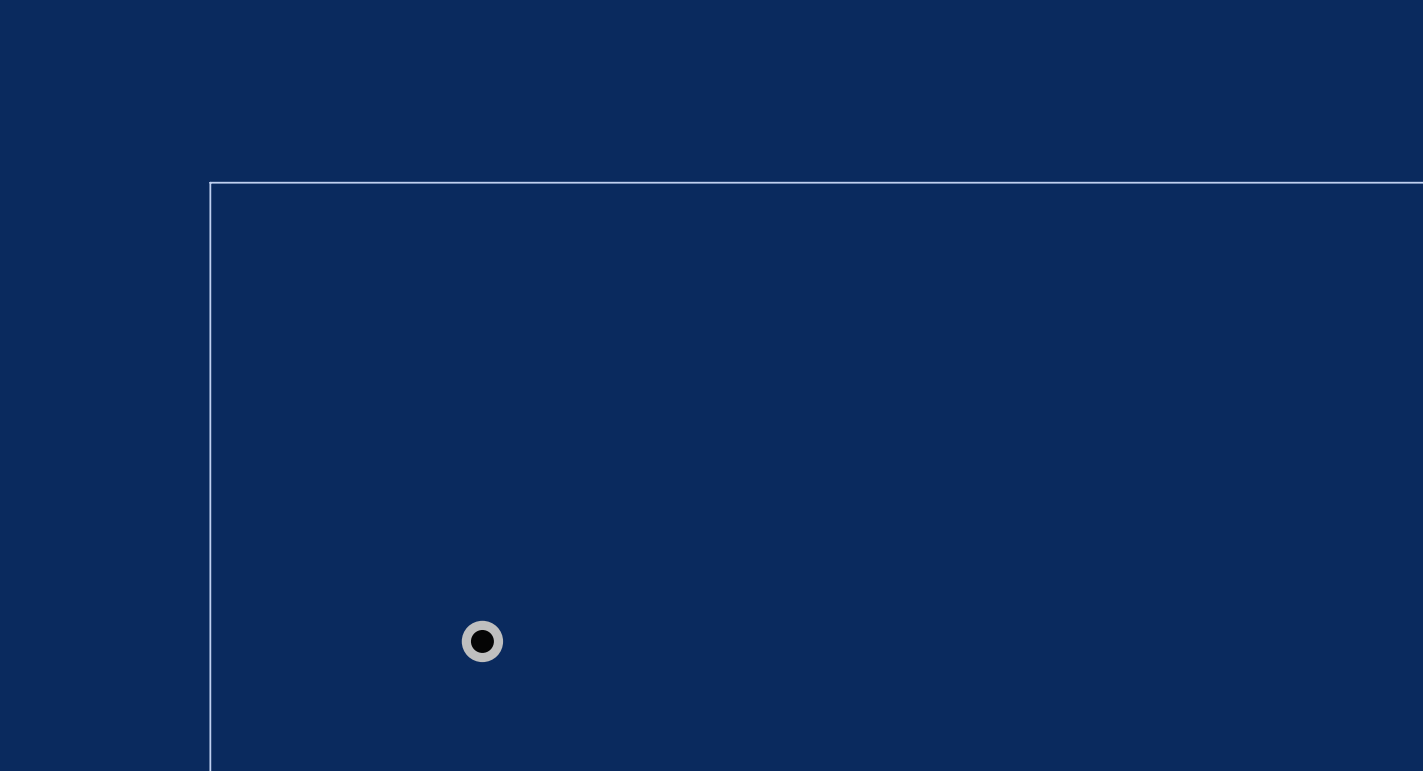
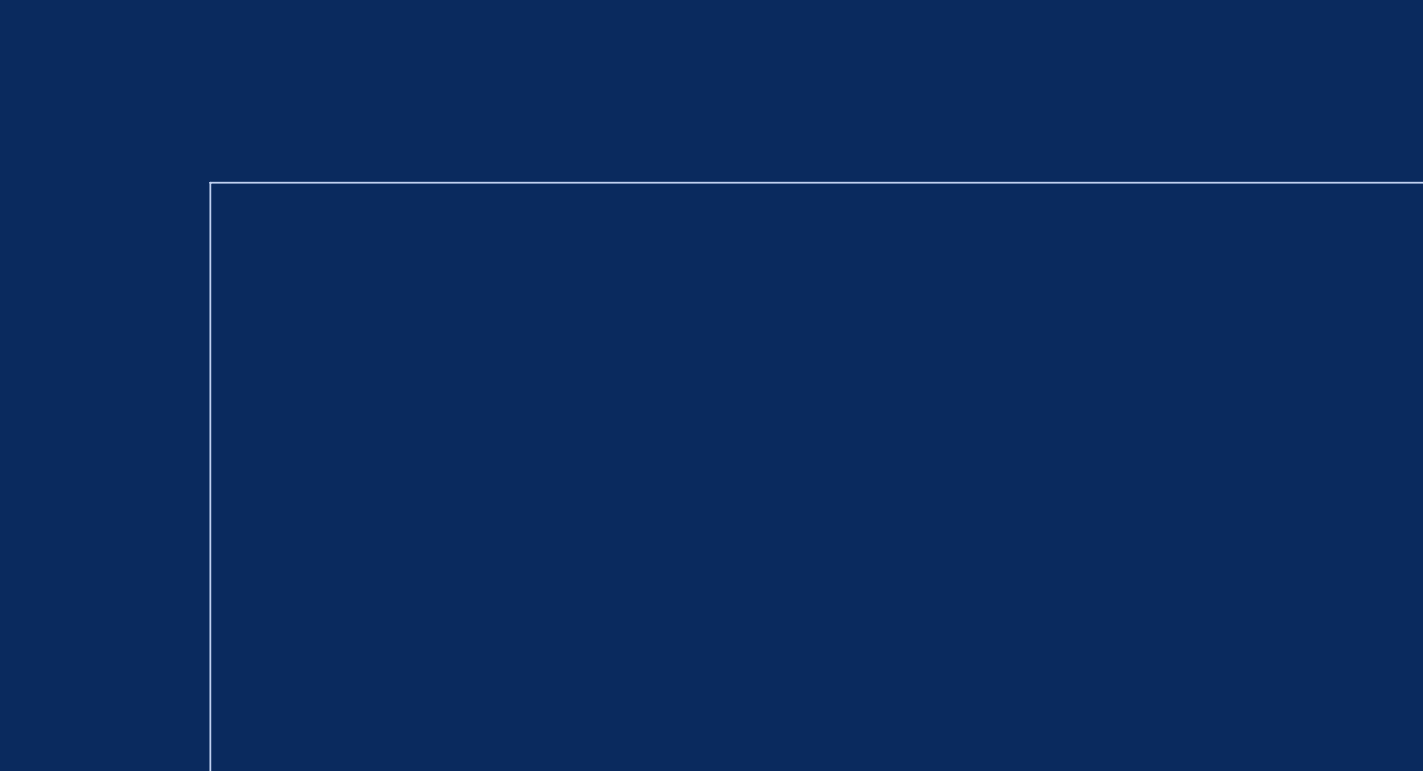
via: (482, 641) -> none

